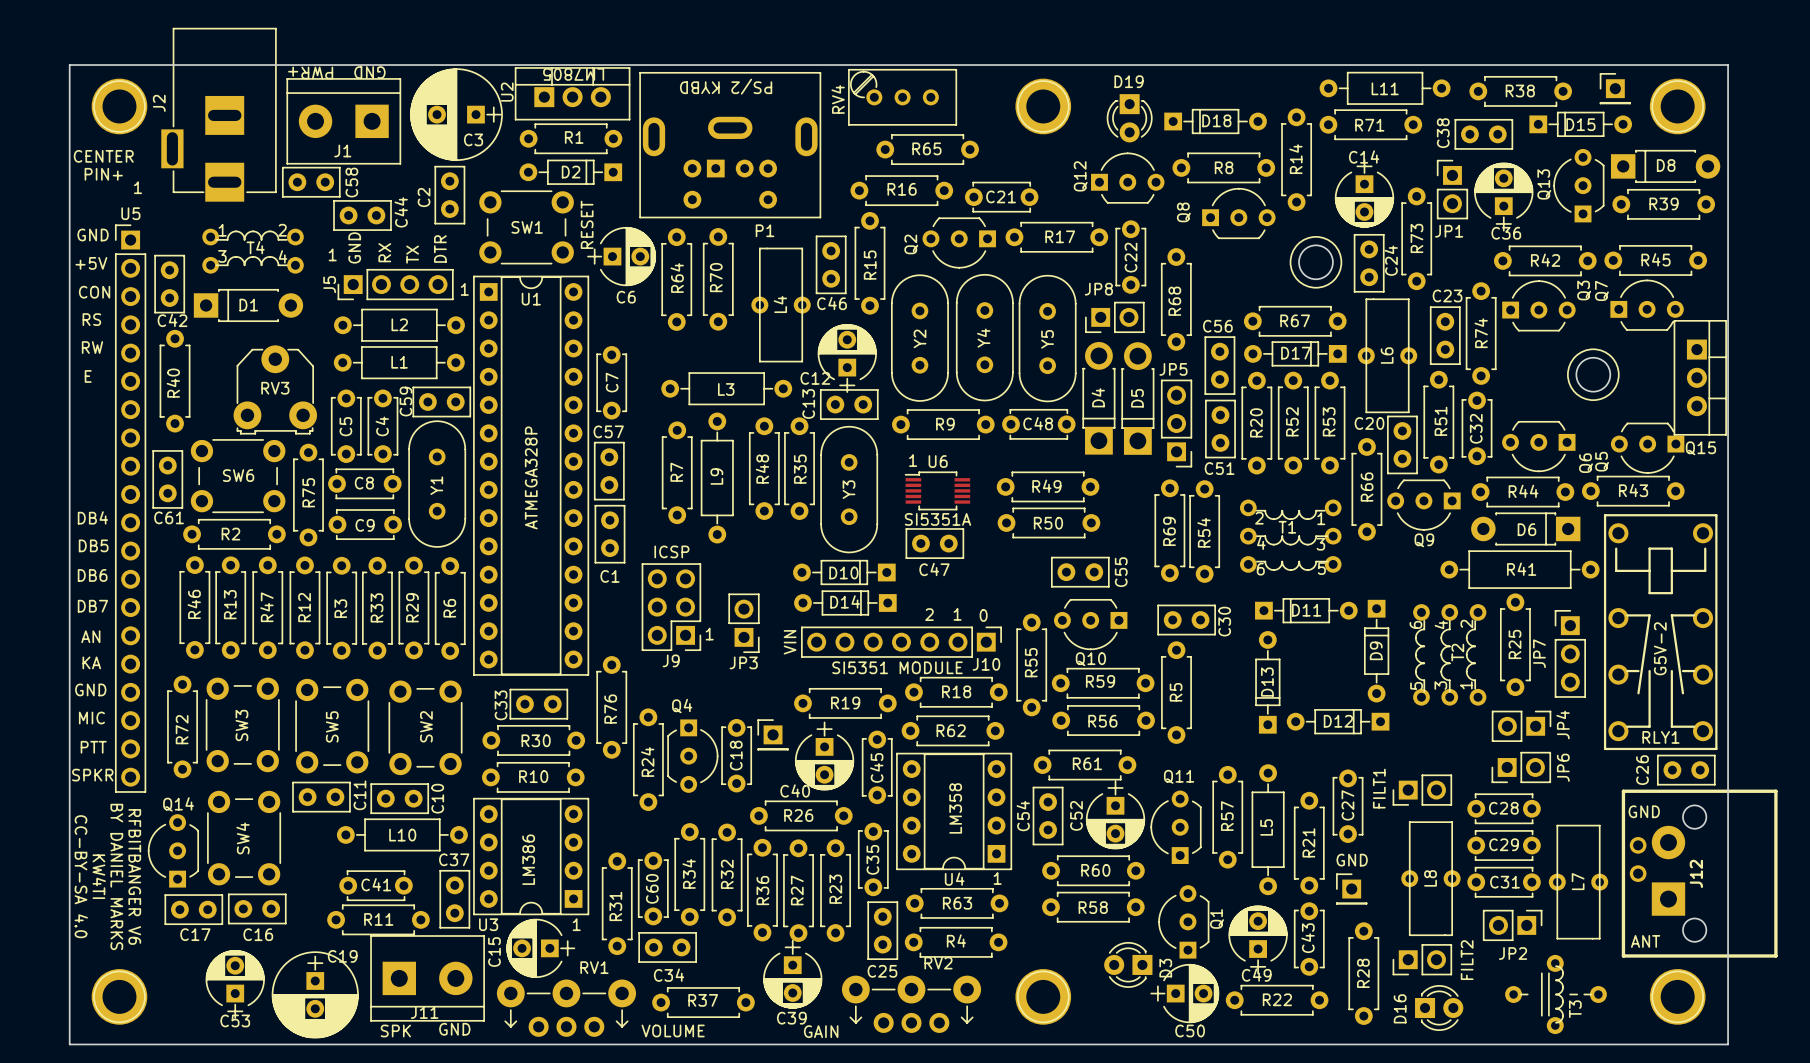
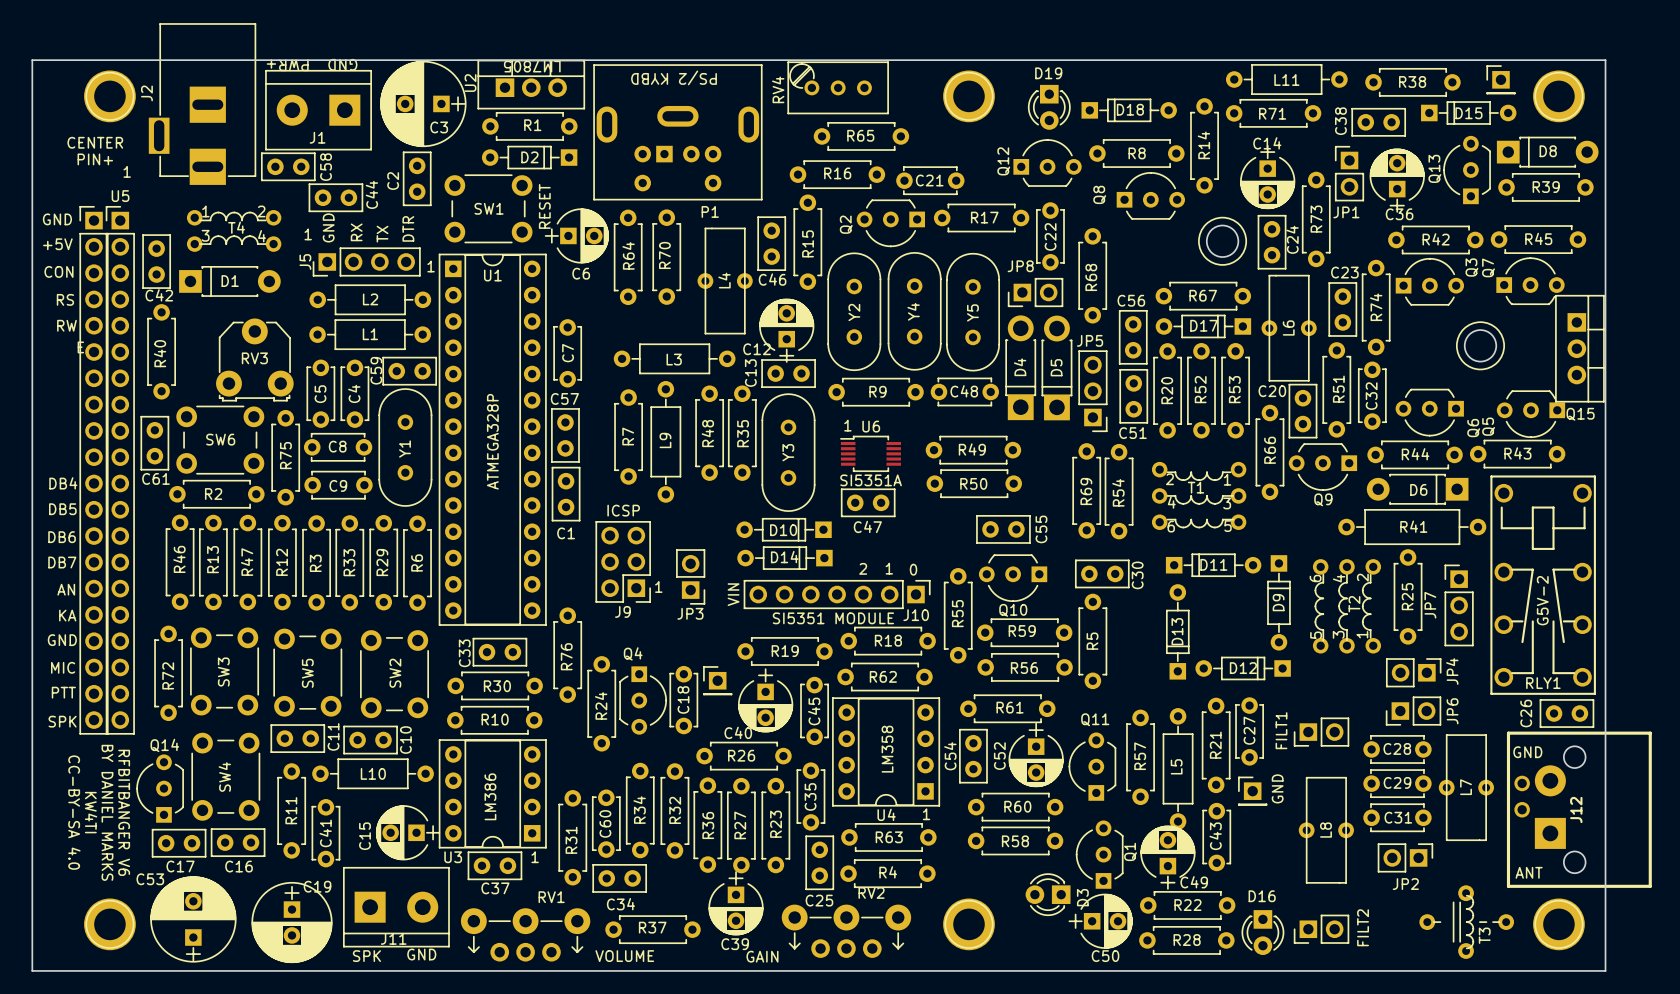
board edge: (69, 65) (69, 1044) (1728, 1044) (1728, 65) (69, 65) -> (32, 60) (32, 970) (1605, 970) (1605, 60) (32, 60)
text position: GND (93, 235) -> GND (57, 219)
text position: +5V (91, 263) -> +5V (57, 244)
text position: CON (94, 292) -> CON (58, 271)
text position: RS (91, 319) -> RS (65, 299)
text position: RW (92, 347) -> RW (66, 325)
part: none -> (94, 470)
text position: DB4 (92, 517) -> DB4 (63, 483)
text position: DB5 (93, 545) -> DB5 (62, 509)
text position: DB6 (92, 575) -> DB6 (62, 537)
text position: DB7 (92, 606) -> DB7 (62, 562)
text position: AN (90, 636) -> AN (66, 589)
text position: KA (91, 662) -> KA (67, 615)
text position: GND (90, 689) -> GND (62, 640)
text position: MIC (91, 717) -> MIC (63, 667)
text position: PTT (93, 747) -> PTT (63, 692)
text: SPKR (92, 775) -> SPK (62, 721)
C27 position: (1348, 806) -> (1249, 731)
R21 position: (1309, 843) -> (1216, 745)
C37 name position: C37 (454, 859) -> C37 (495, 888)
text rotation: 0° (1352, 860) -> 90° counterclockwise (1277, 788)
L8 position: (1430, 878) -> (1326, 830)
L7 position: (1578, 882) -> (1466, 787)
C41 rotation: 0° (376, 885) -> 90° clockwise (325, 833)
part position: (1351, 889) -> (1252, 791)
C37 rotation: 0° (454, 899) -> 90° clockwise (494, 865)
C37 position: (454, 899) -> (494, 865)
R11 rotation: 0° (378, 919) -> 90° clockwise (291, 810)
R11 position: (378, 919) -> (291, 810)
C49 position: (1258, 939) -> (1167, 857)
C43 position: (1309, 939) -> (1216, 837)
C15 position: (540, 948) -> (408, 832)
C53 footprint: [205, 950, 265, 1019] -> [150, 876, 237, 963]
part position: (1422, 959) -> (1321, 929)
text position: FILT2 (1467, 960) -> FILT2 (1363, 927)
R28 rotation: 0° (1363, 973) -> 90° clockwise (1186, 940)
R28 position: (1363, 973) -> (1186, 940)
C49 name position: C49 (1256, 975) -> C49 (1194, 882)
T3 position: (1555, 994) -> (1466, 922)
R22 position: (1277, 1000) -> (1187, 905)
D16 rotation: 0° (1439, 1008) -> 90° clockwise (1262, 932)
D16 position: (1439, 1008) -> (1262, 932)
C53 name position: C53 (235, 1020) -> C53 (150, 879)

